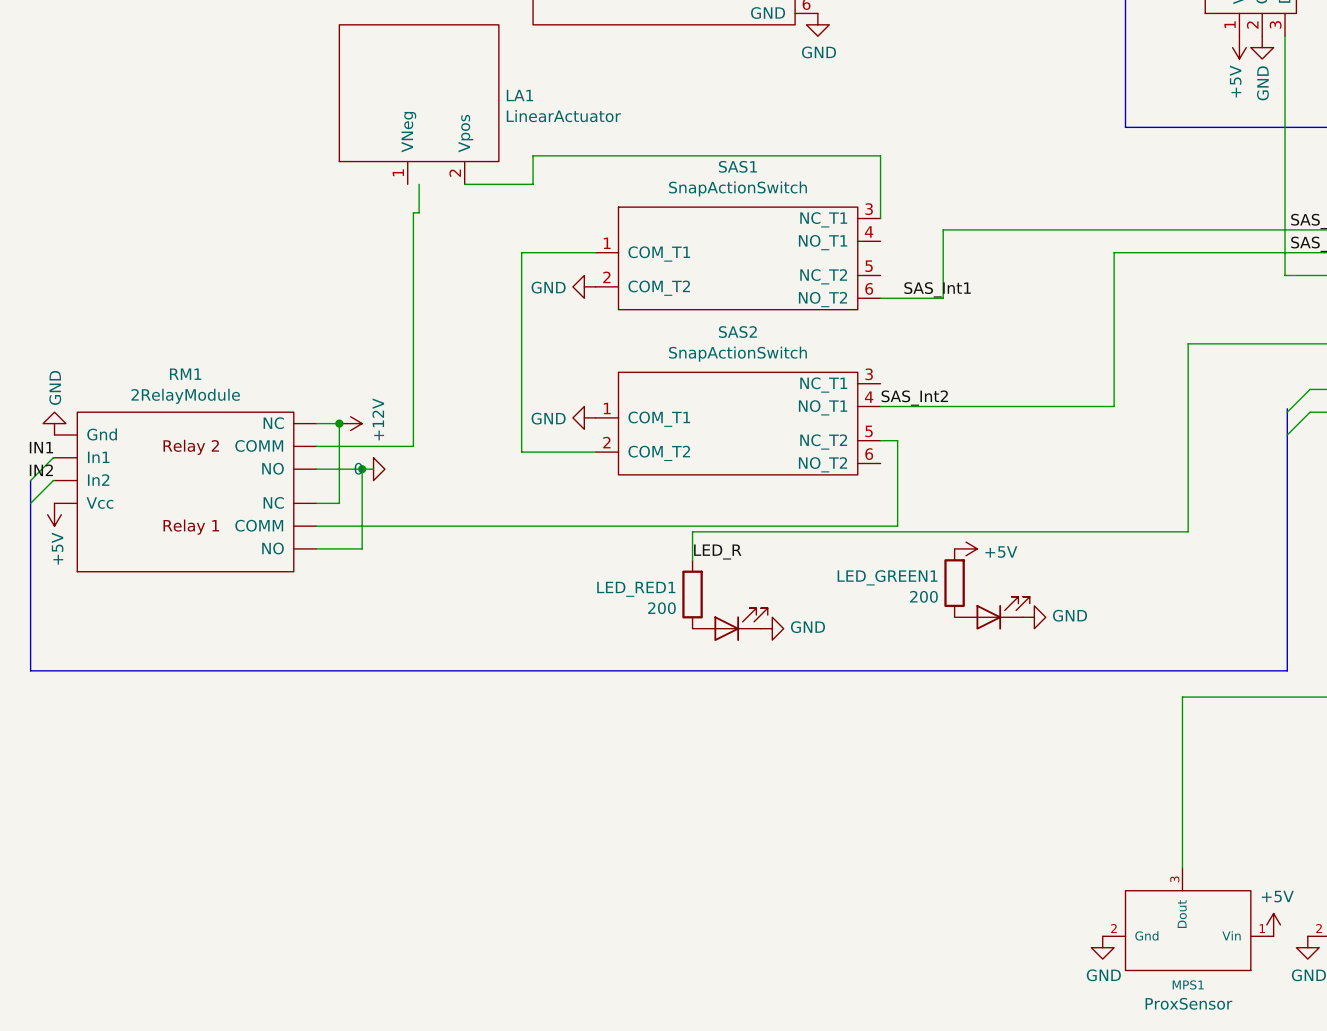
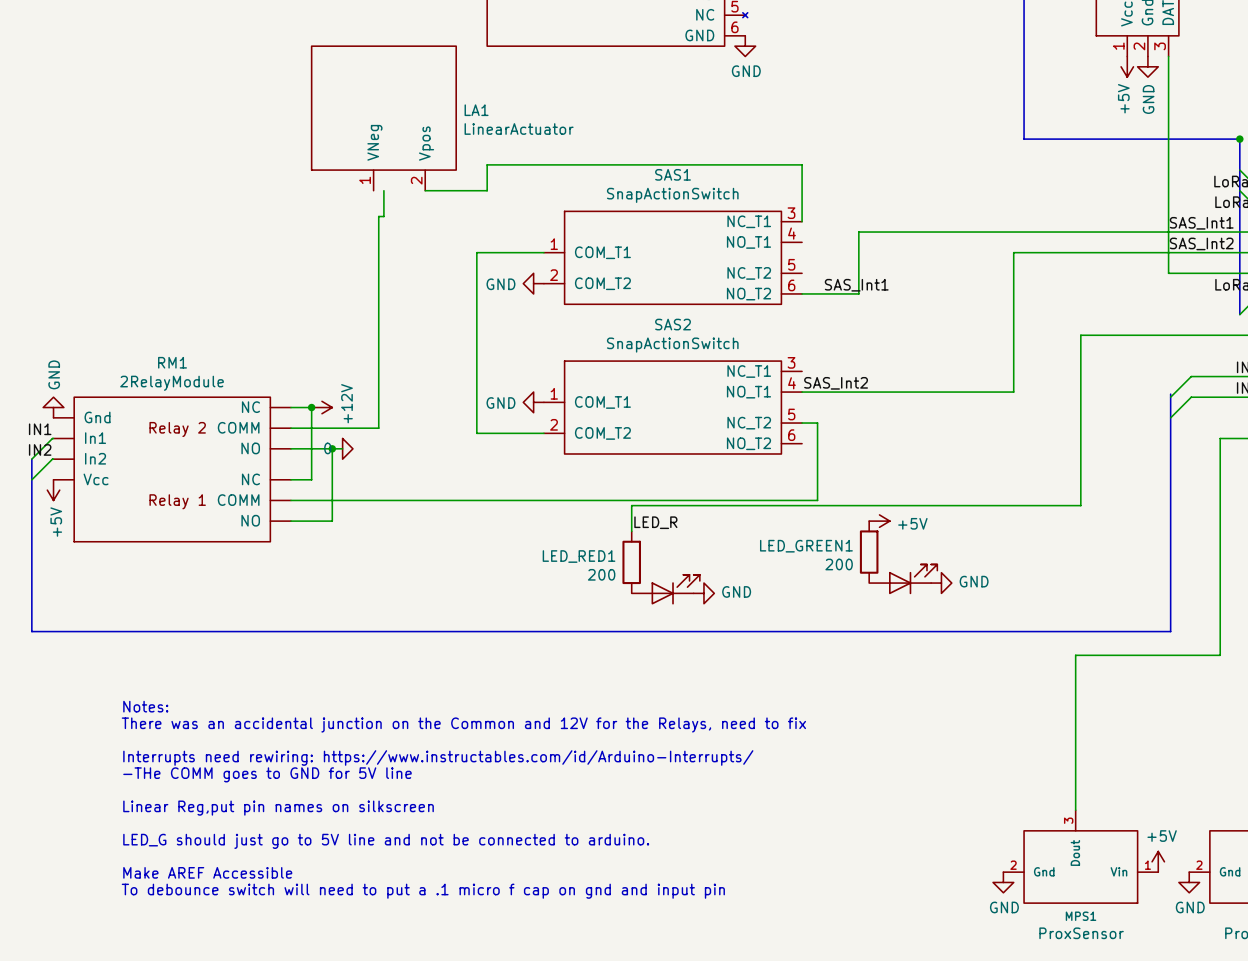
text: none -> Notes: (145, 706)
text: none -> There was an accidental junction on the Common and 12V for the Relays, need to fix (463, 724)
text: none -> Interrupts need rewiring: https://www.instructables.com/id/Arduino-Interrupts/ (438, 757)
text: none -> -THe COMM goes to GND for 5V line (267, 774)
text: none -> Linear Reg,put pin names on silkscreen (278, 808)
text: none -> LED_G should just go to 5V line and not be connected to arduino. (386, 841)
text: none -> Make AREF Accessible (207, 872)
text: none -> To debounce switch will need to put a .1 micro f cap on gnd and input pin (423, 891)

